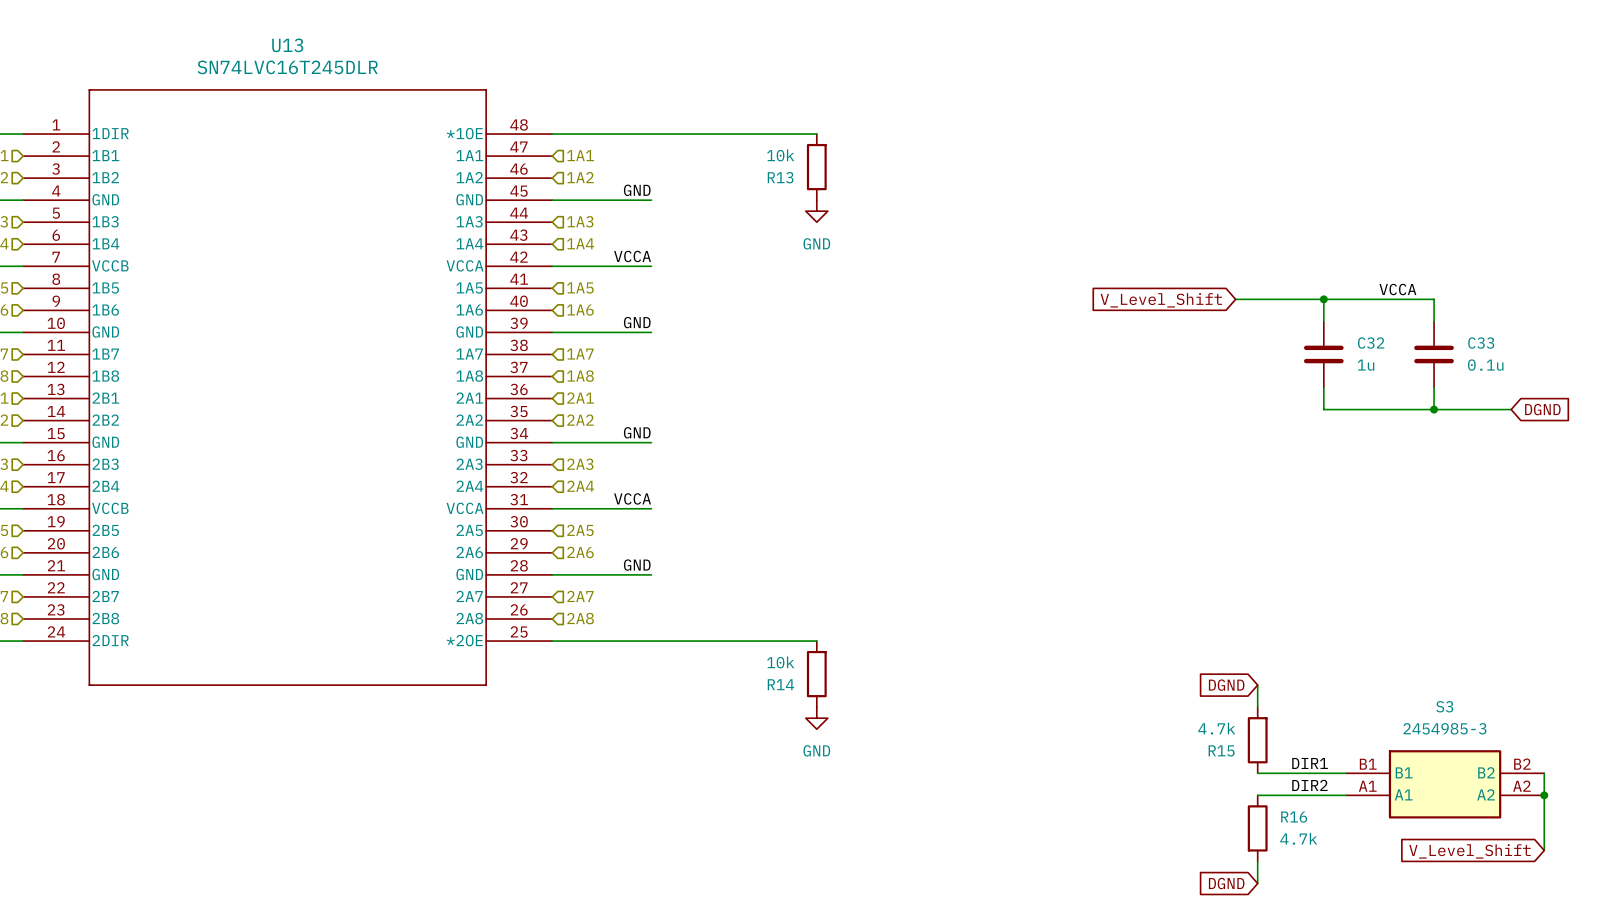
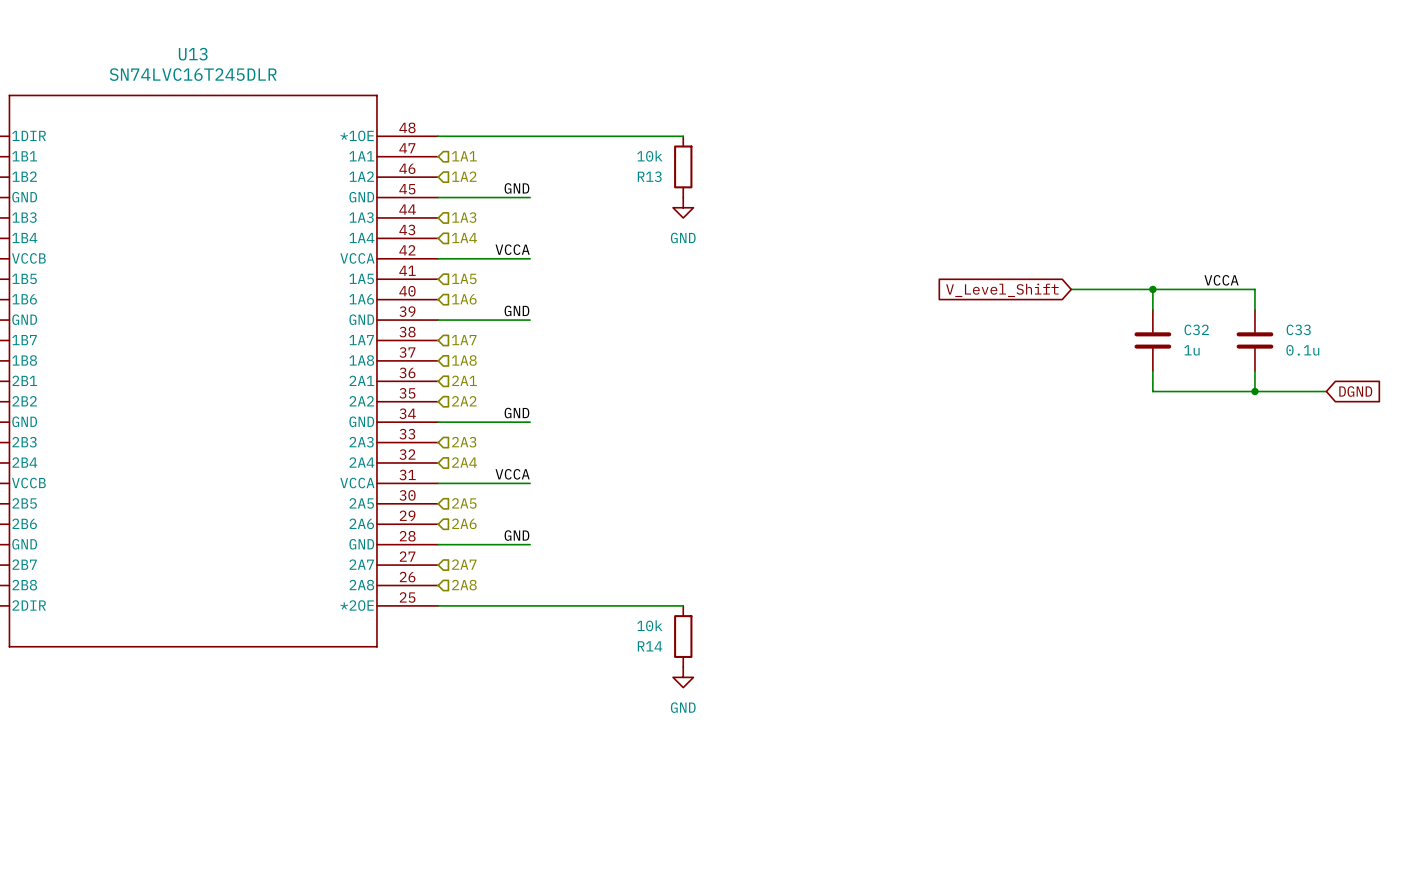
global label: DGND (1226, 685) -> none
wire: (1257, 685) (1257, 707) -> none
R15: 4.7k (1257, 740) -> none
label: DIR1 (1310, 763) -> none
wire: (1257, 773) (1345, 773) -> none
wire: (1544, 773) (1544, 850) -> none
S3: 2454985-3 (1445, 784) -> none
label: DIR2 (1309, 785) -> none
wire: (1257, 795) (1345, 795) -> none
junction: (1544, 795) -> none
R16: 4.7k (1257, 828) -> none
global label: V_Level_Shift (1469, 851) -> none
wire: (1257, 861) (1257, 883) -> none
global label: DGND (1226, 883) -> none

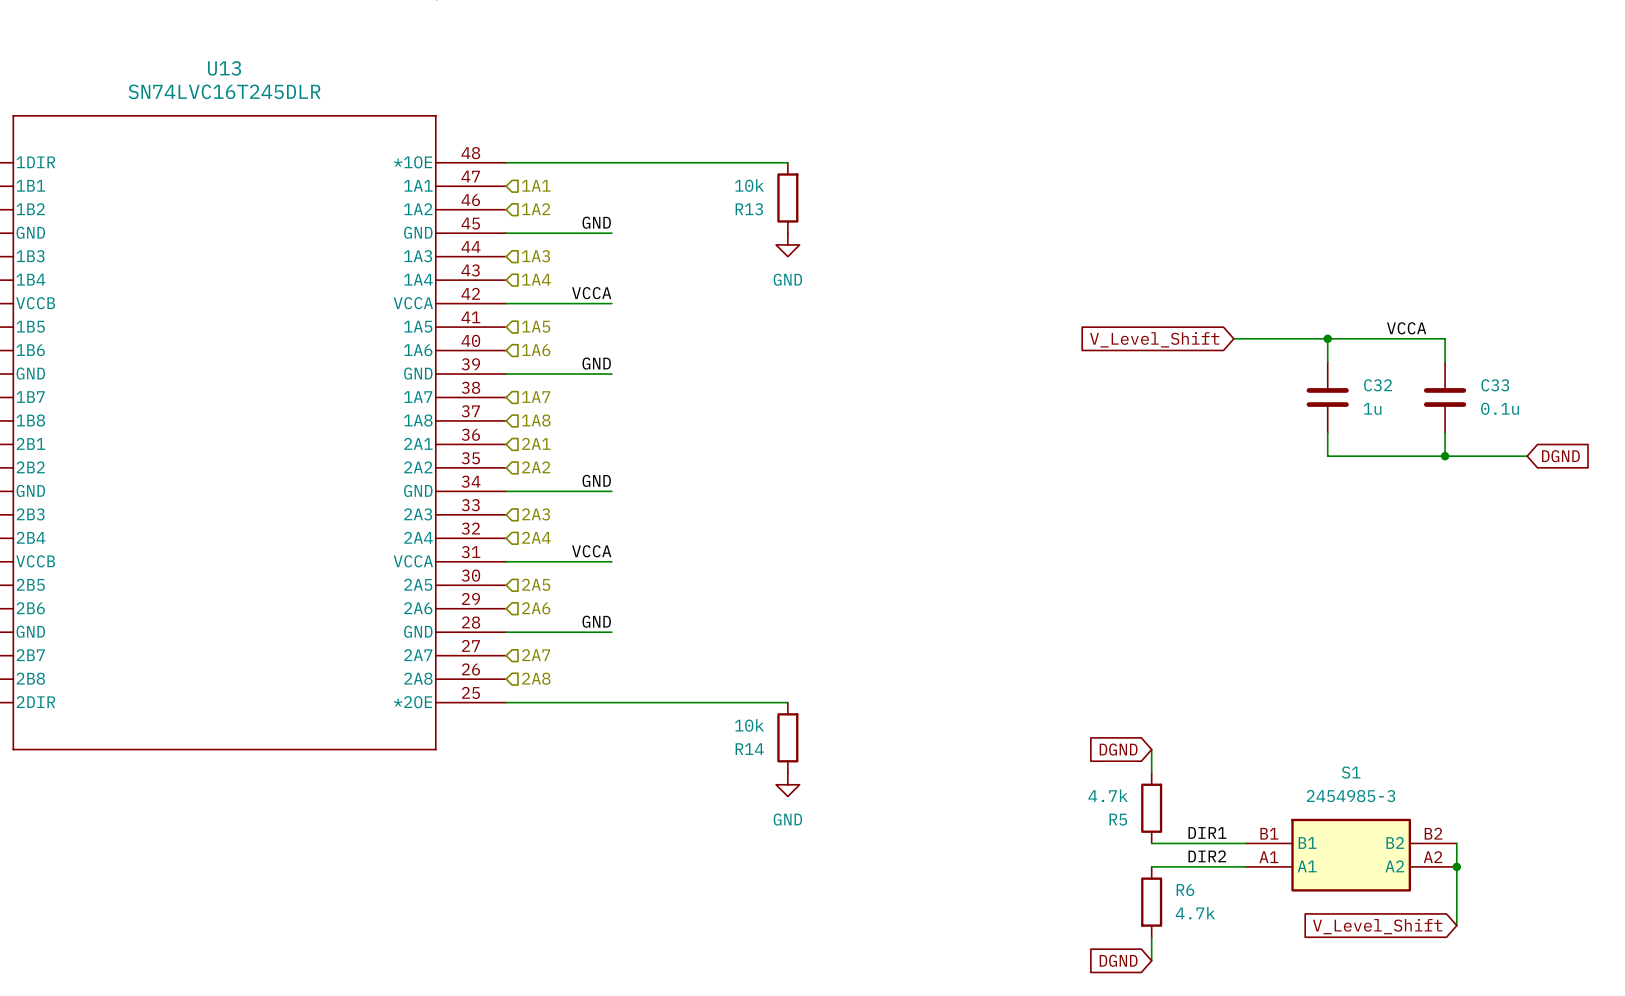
global label: none -> DGND (1118, 749)
wire: none -> (1151, 749) (1151, 773)
R5: none -> 4.7k (1151, 808)
label: none -> DIR1 (1207, 832)
wire: none -> (1151, 843) (1245, 843)
wire: none -> (1456, 843) (1456, 925)
S1: none -> 2454985-3 (1351, 855)
label: none -> DIR2 (1207, 856)
wire: none -> (1151, 866) (1245, 866)
junction: none -> (1456, 866)
R6: none -> 4.7k (1151, 902)
global label: none -> V_Level_Shift (1377, 926)
wire: none -> (1151, 937) (1151, 960)
global label: none -> DGND (1118, 960)

